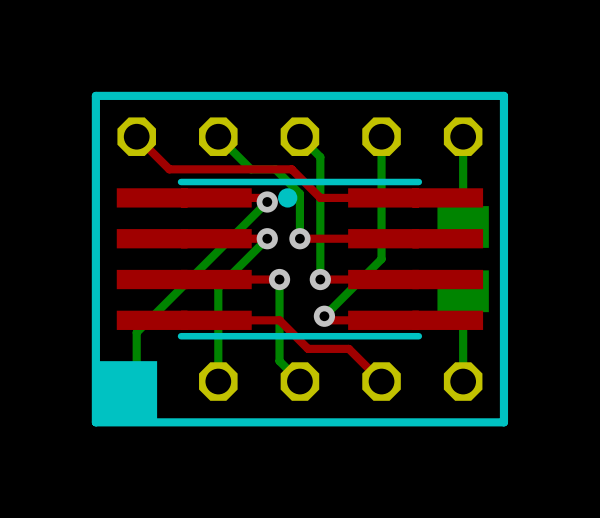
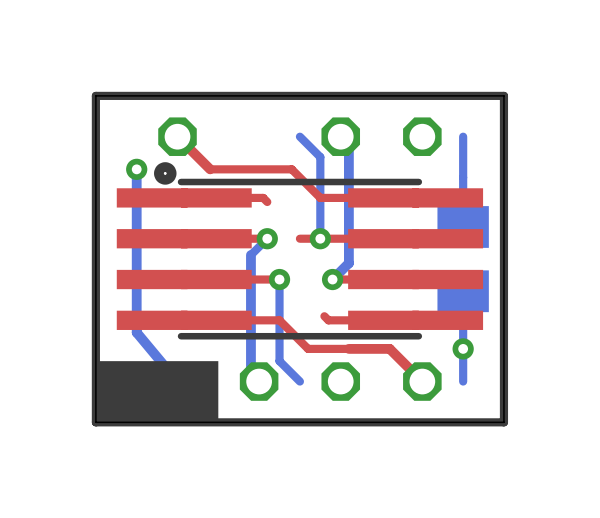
board edge: none -> (95, 95) (503, 95) (503, 422) (95, 422) (95, 95)
top track: (136, 136) (169, 169) (210, 169) -> (177, 136) (210, 169)
part: (136, 136) -> none
part: none -> (177, 136)
bottom track: (218, 136) (250, 169) (275, 169) (299, 193) (299, 238) -> none
part: (218, 136) -> none
part: (299, 136) -> none
bottom track: none -> (340, 136) (348, 144) (348, 263) (332, 279)
part: none -> (340, 136)
bottom track: (381, 136) (381, 259) (324, 316) -> none
part: (381, 136) -> none
part: none -> (422, 136)
part: (463, 136) -> none
drawing: none -> [154, 162, 177, 185]
bottom track: none -> (136, 169) (136, 332) (177, 381)
via: none -> (136, 169)
drawing: [278, 188, 298, 208] -> none
bottom track: (267, 201) (136, 332) (136, 381) -> none
via: (267, 201) -> none
via position: (299, 238) -> (320, 238)
bottom track: (320, 238) (320, 279) -> none
bottom track: (250, 255) (218, 287) (218, 381) -> (250, 255) (250, 373) (259, 381)
via position: (320, 279) -> (332, 279)
via: (324, 316) -> none
top track: (348, 348) (381, 381) -> (348, 348) (389, 348) (422, 381)
via: none -> (463, 348)
drawing shape: [95, 361, 158, 423] -> [95, 361, 219, 423]
part: (218, 381) -> none
part: none -> (259, 381)
part: (299, 381) -> none
part: none -> (340, 381)
part: (381, 381) -> none
part: none -> (422, 381)
part: (463, 381) -> none

